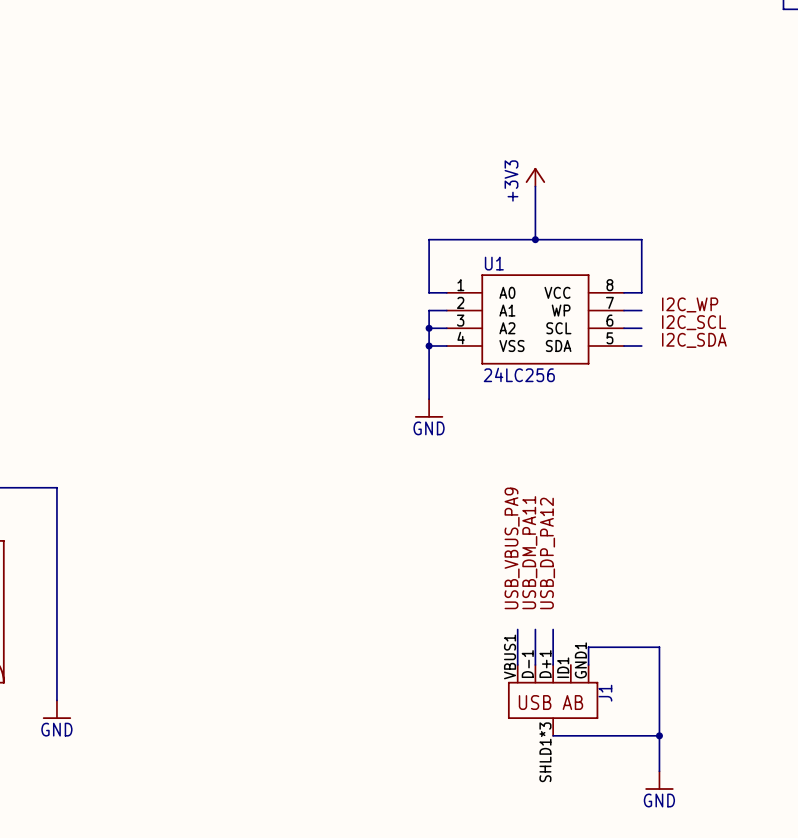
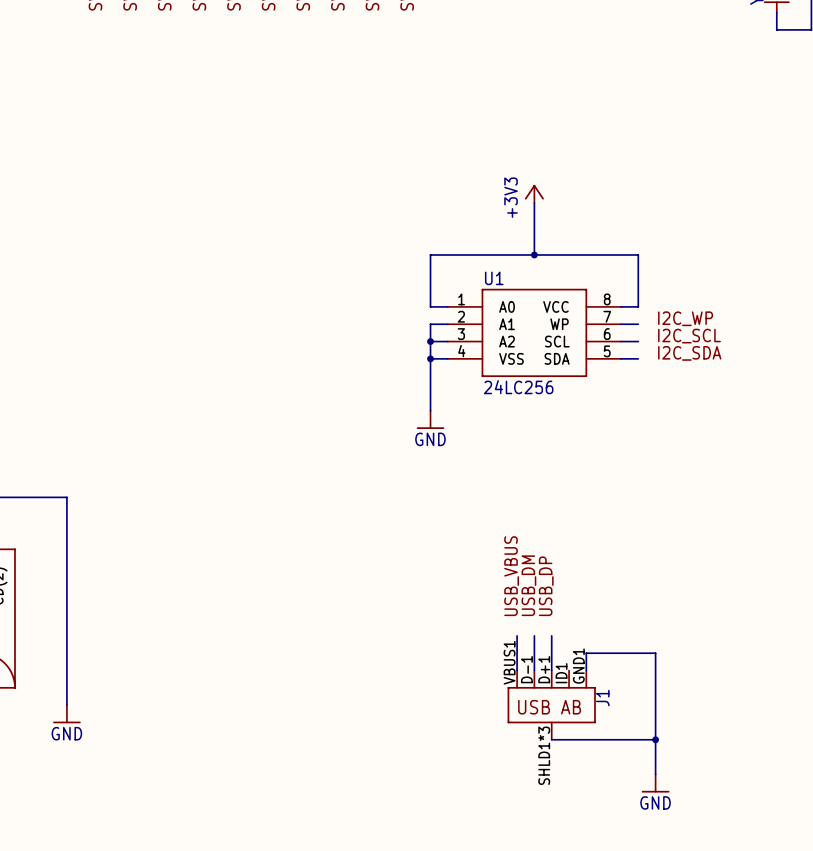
label: USB_VBUS_PA9 (512, 548) -> USB_VBUS (511, 576)
label: USB_DM_PA11 (529, 552) -> USB_DM (528, 585)
label: USB_DP_PA12 (547, 553) -> USB_DP (546, 586)

